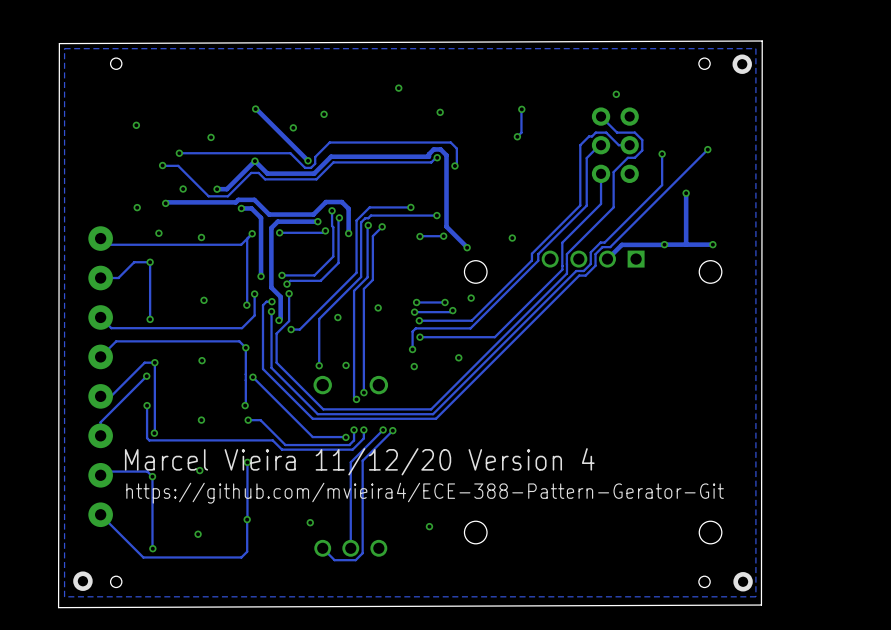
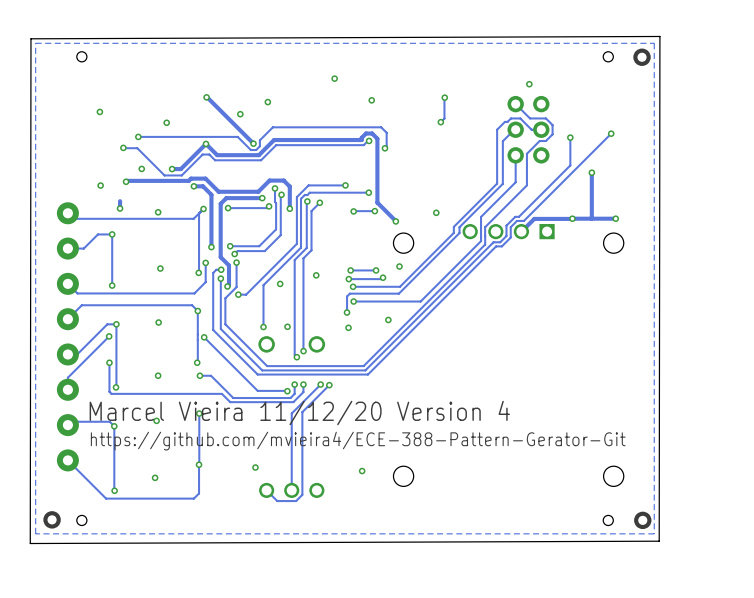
track: none -> (120, 201) (120, 208)

